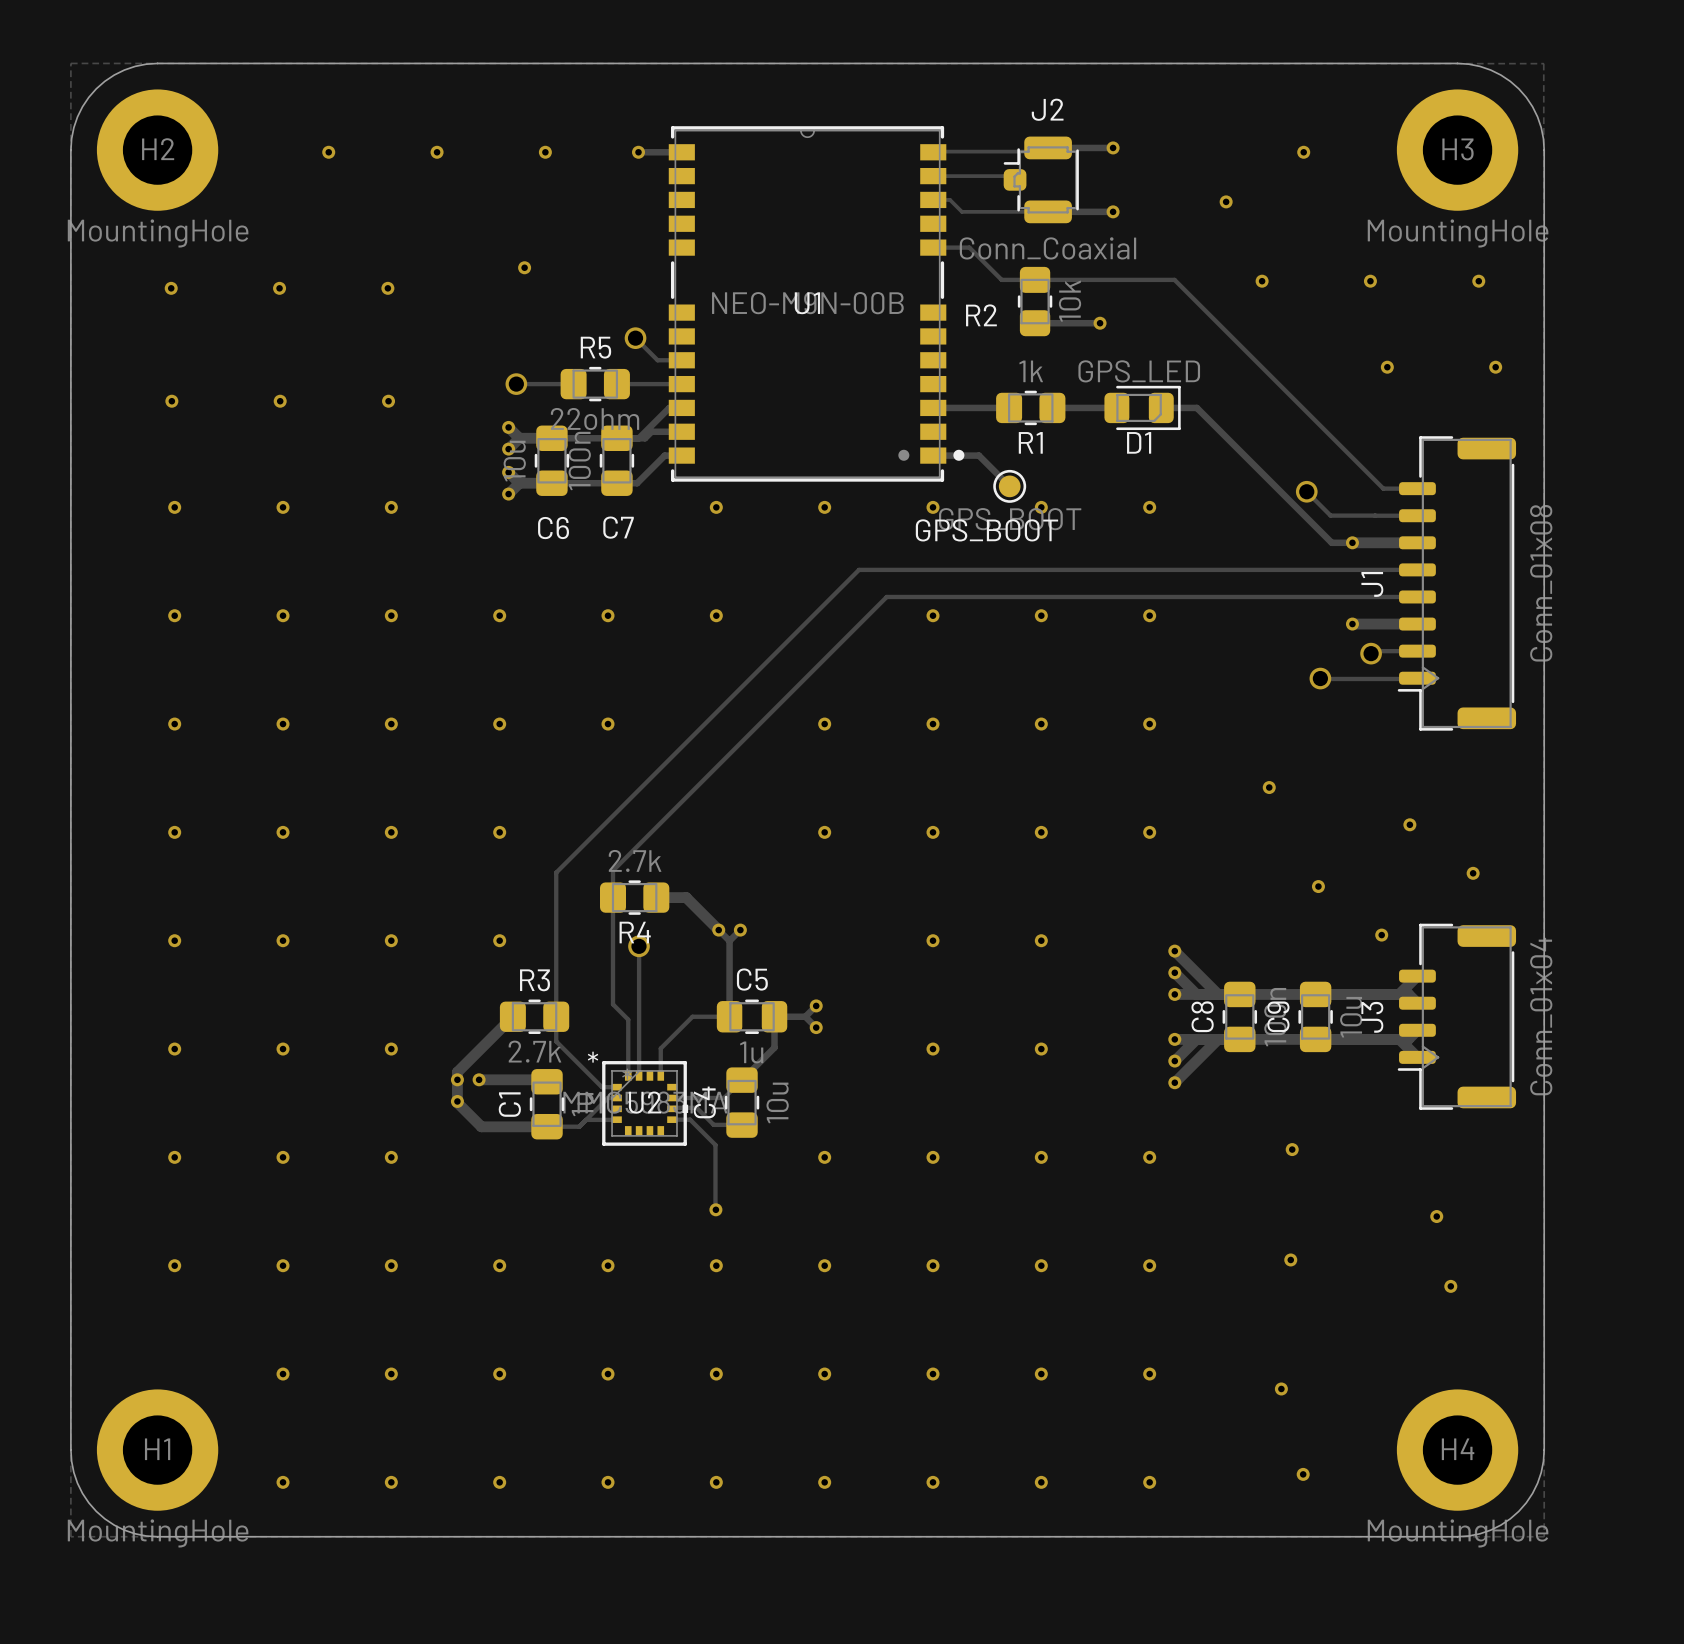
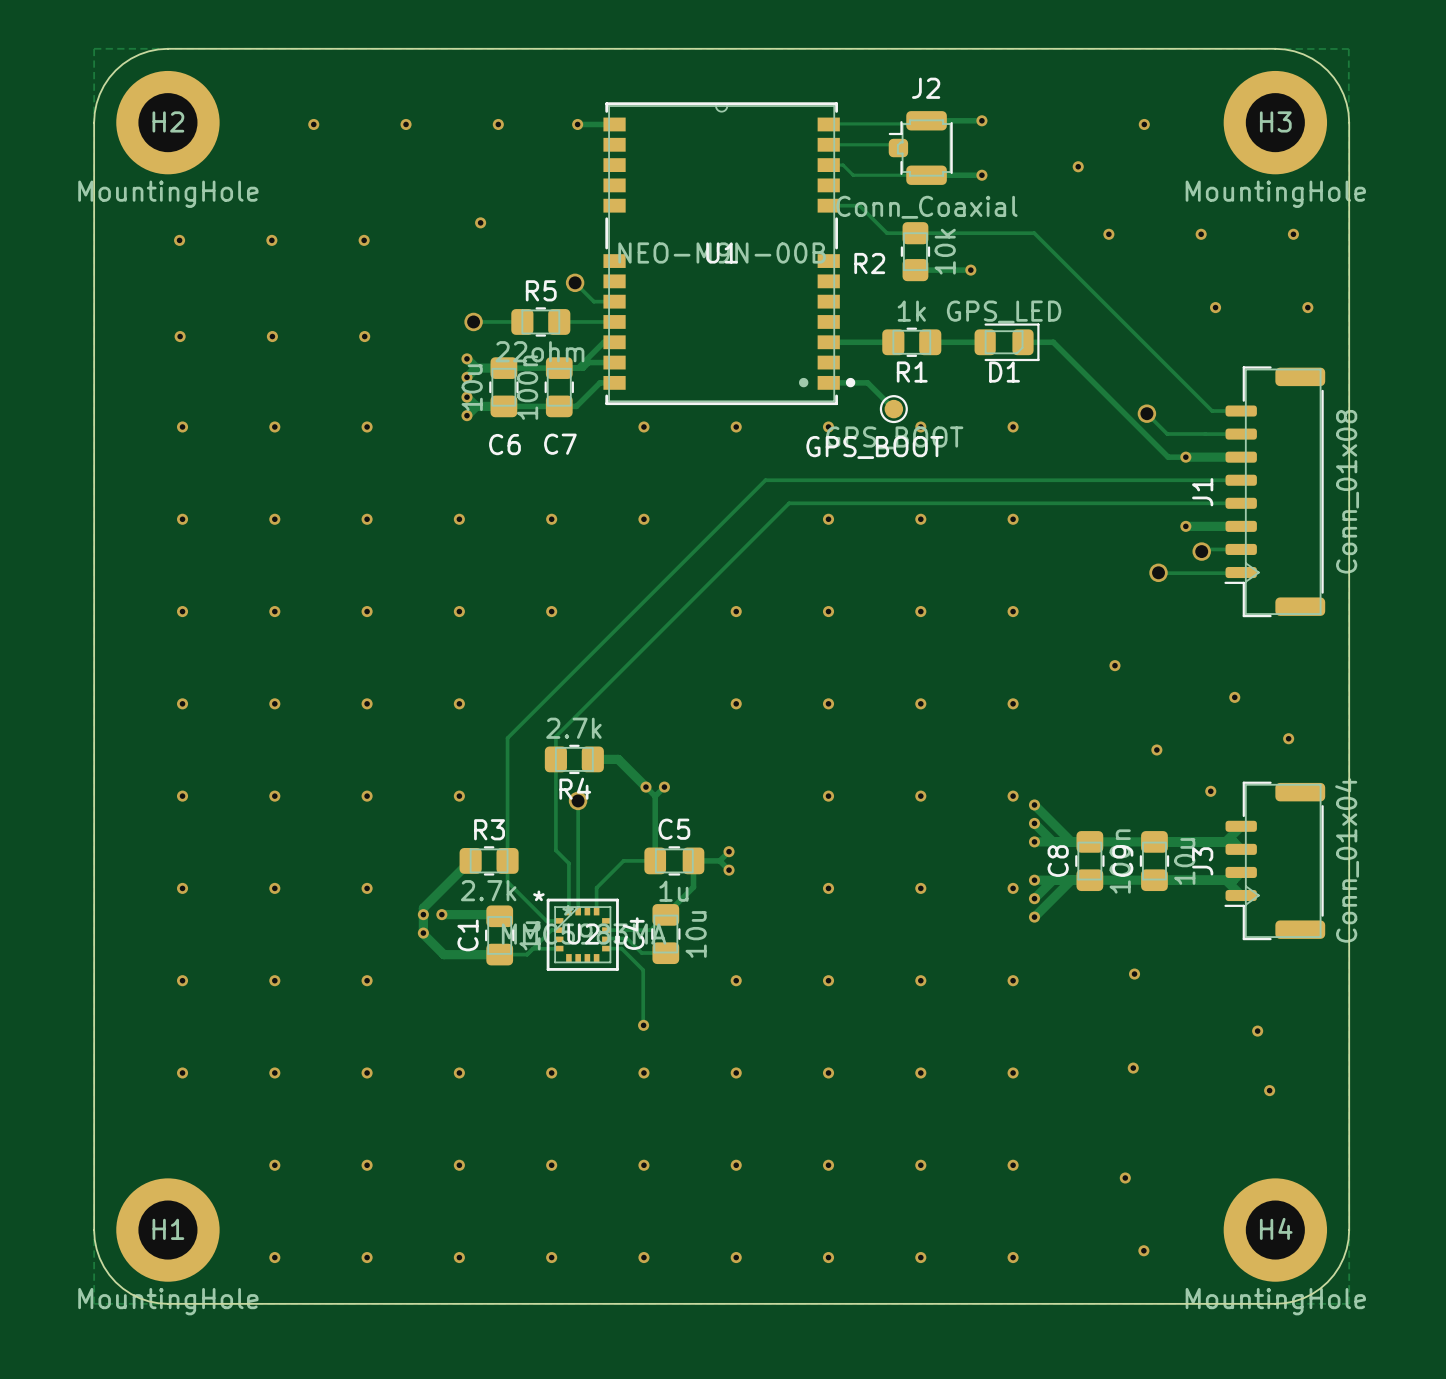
via: none -> (1013, 796)
via: none -> (1013, 888)

